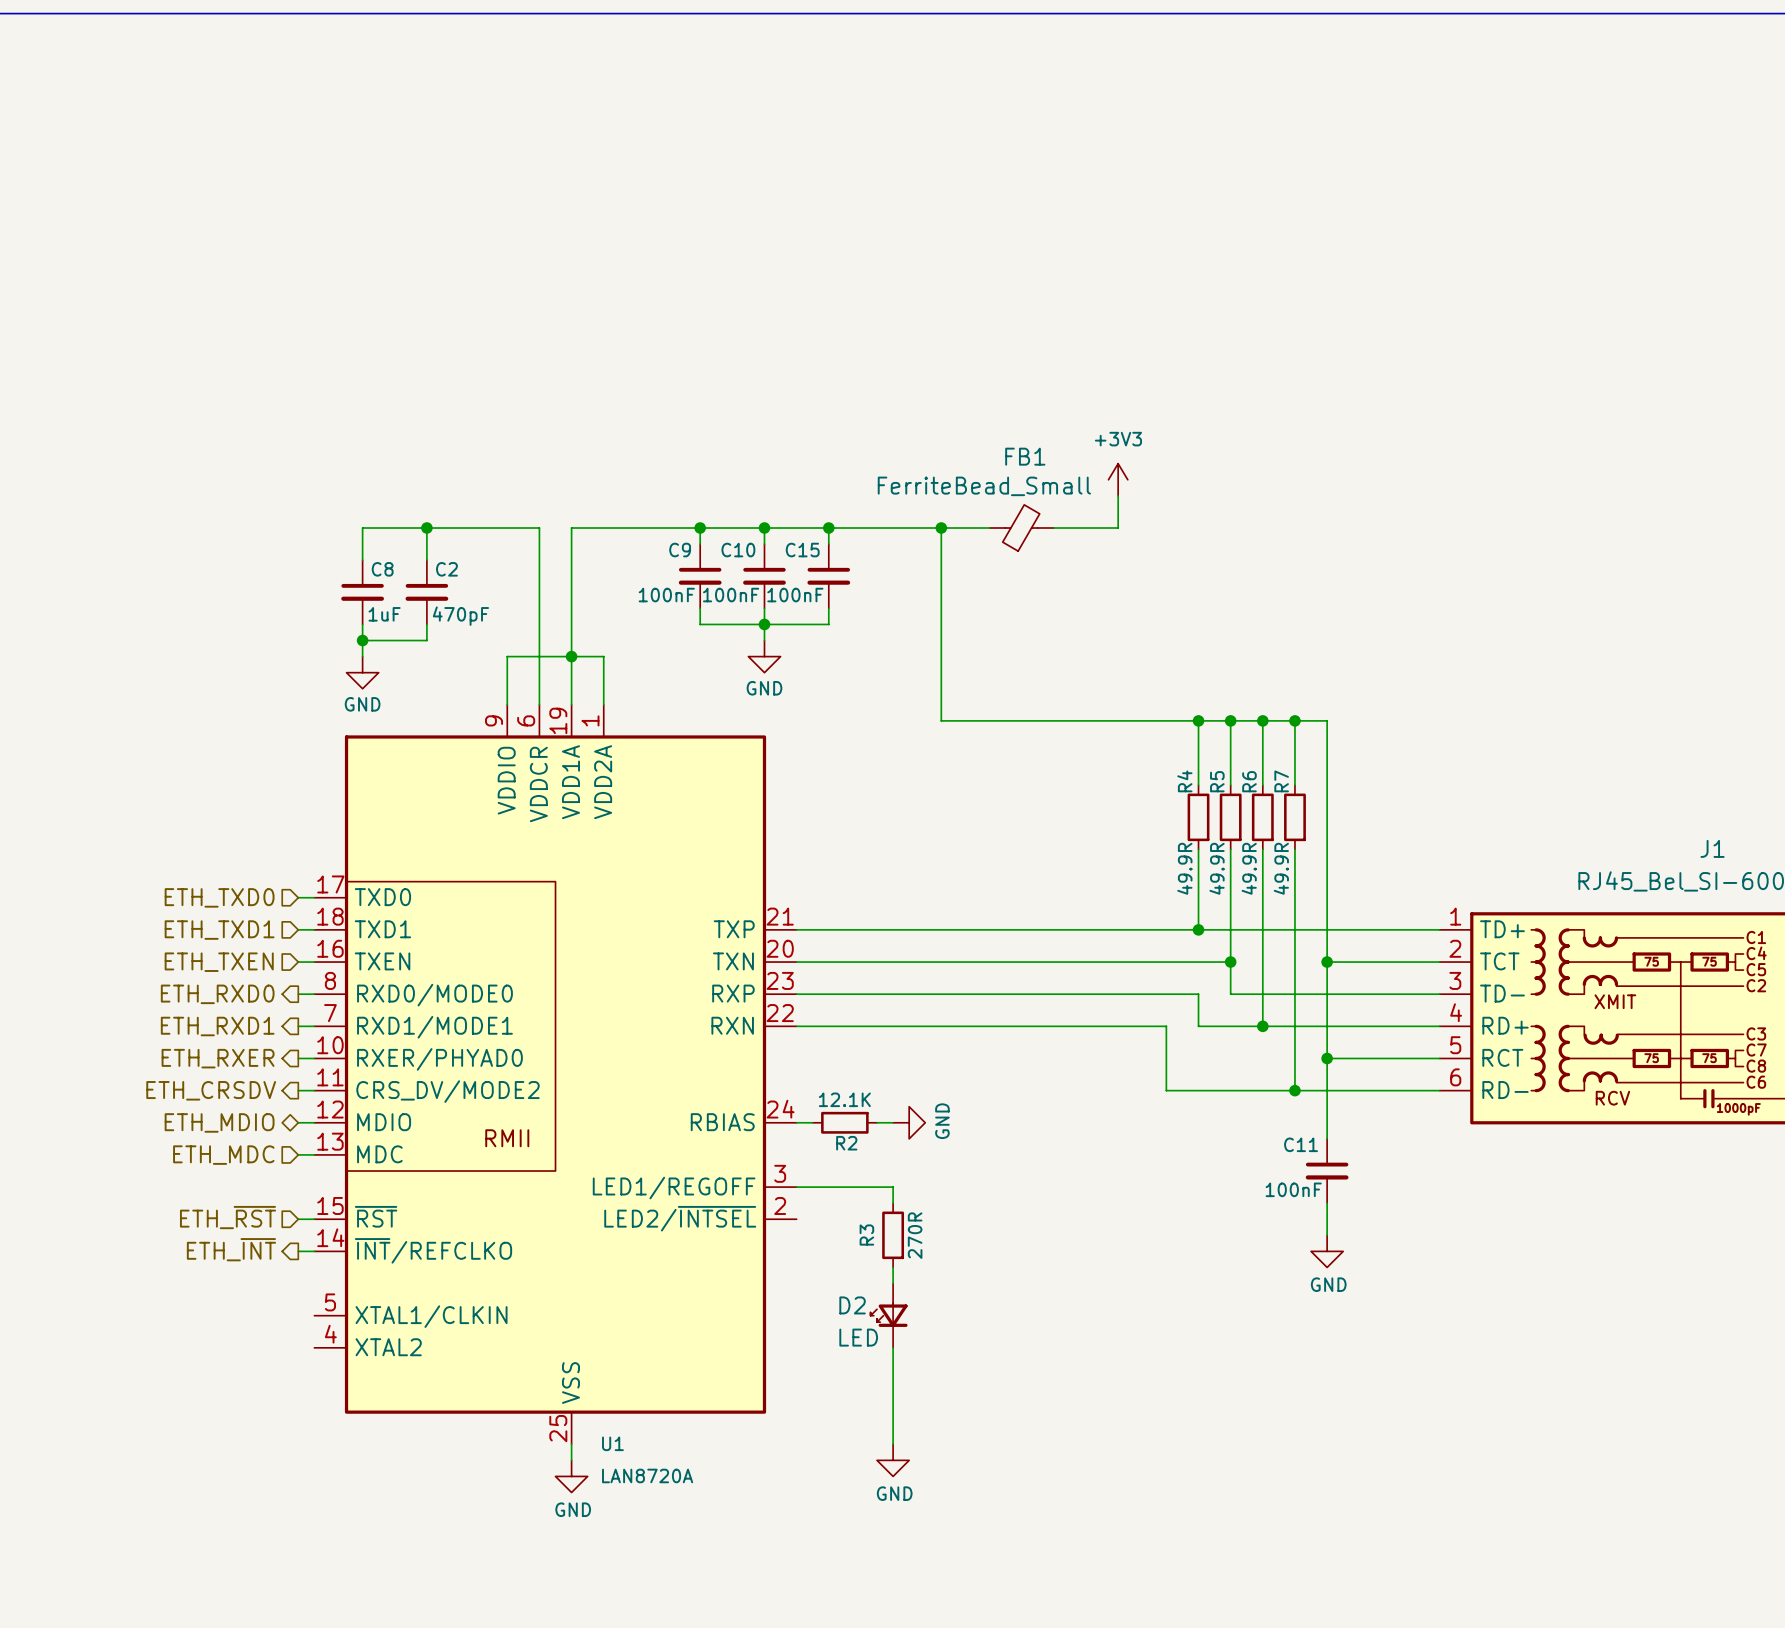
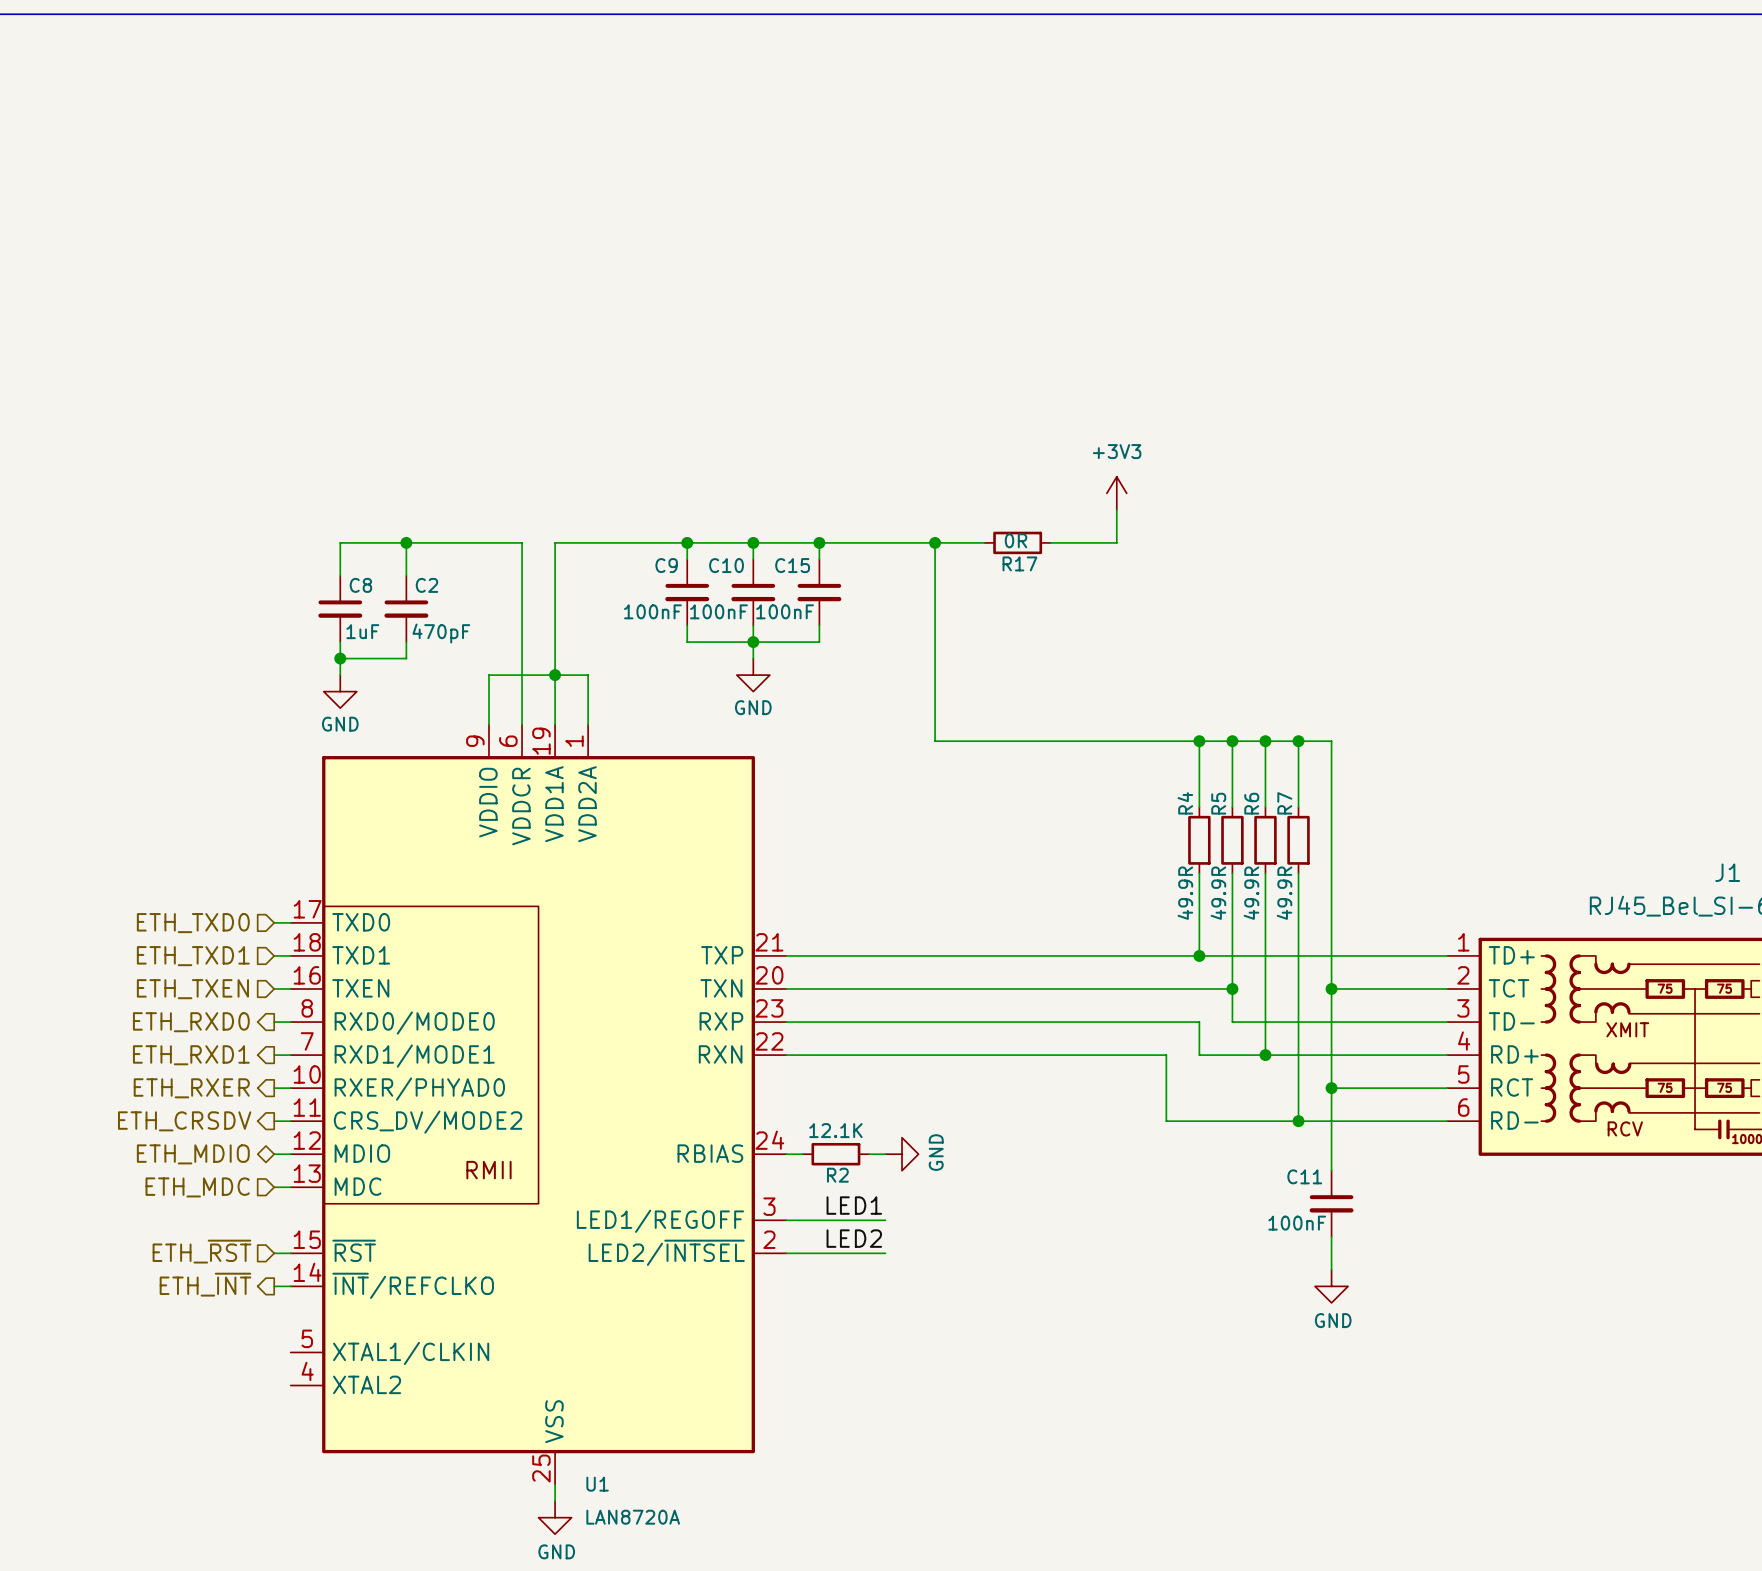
FB1: FerriteBead_Small (1021, 528) -> none
R17: none -> 0R (1017, 542)
label: none -> LED1 (854, 1205)
wire: (893, 1187) (893, 1203) -> none
label: none -> LED2 (854, 1238)
wire: none -> (786, 1253) (885, 1253)
R3: 270R (893, 1235) -> none
wire: (893, 1267) (893, 1283) -> none
D2: LED (889, 1315) -> none
wire: (893, 1347) (893, 1444) -> none
power symbol: GND (893, 1460) -> none

